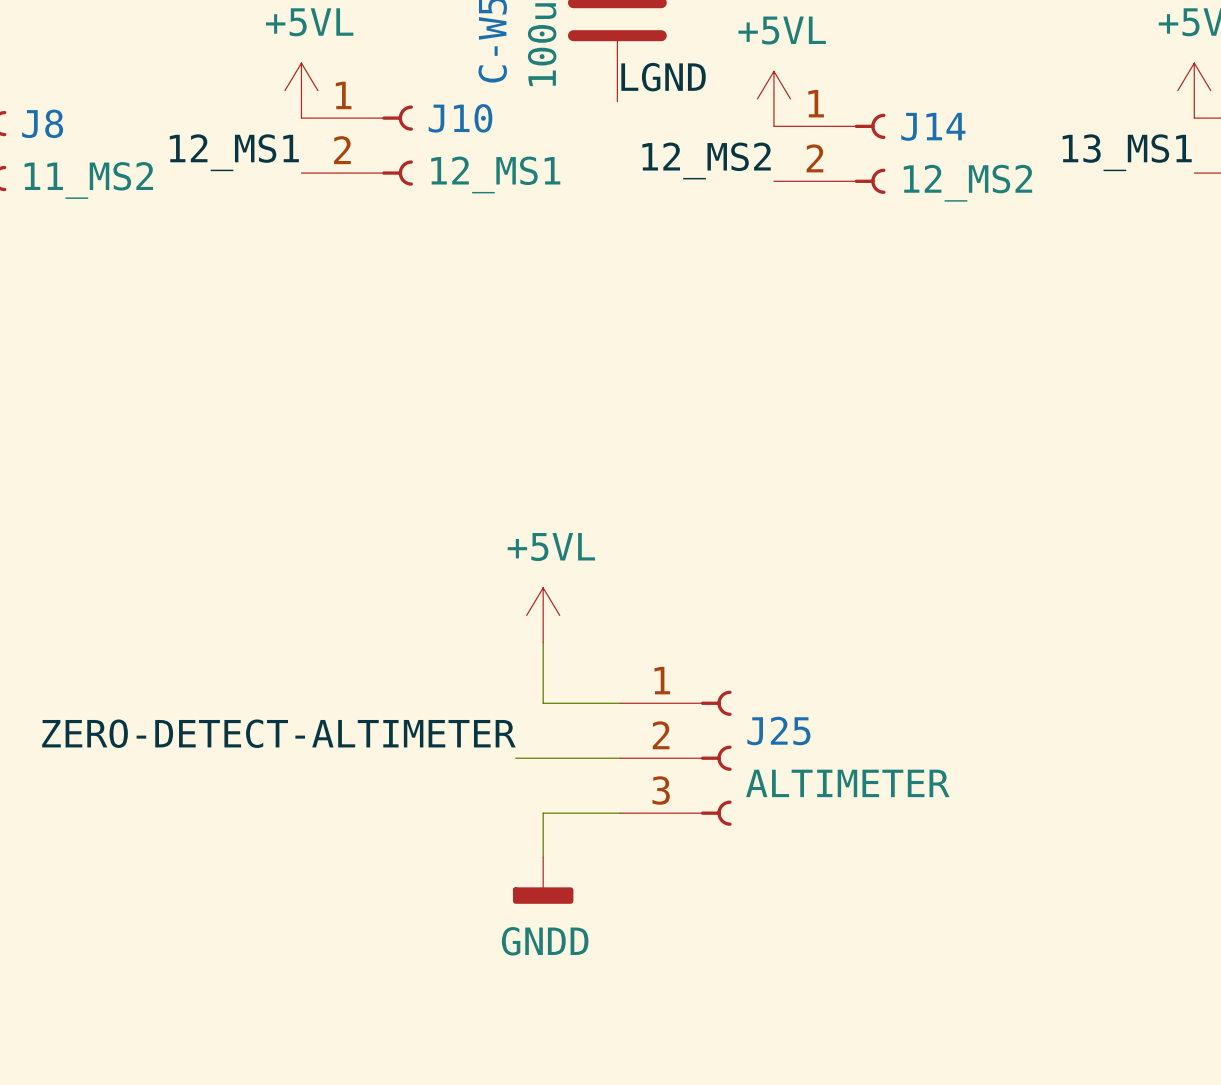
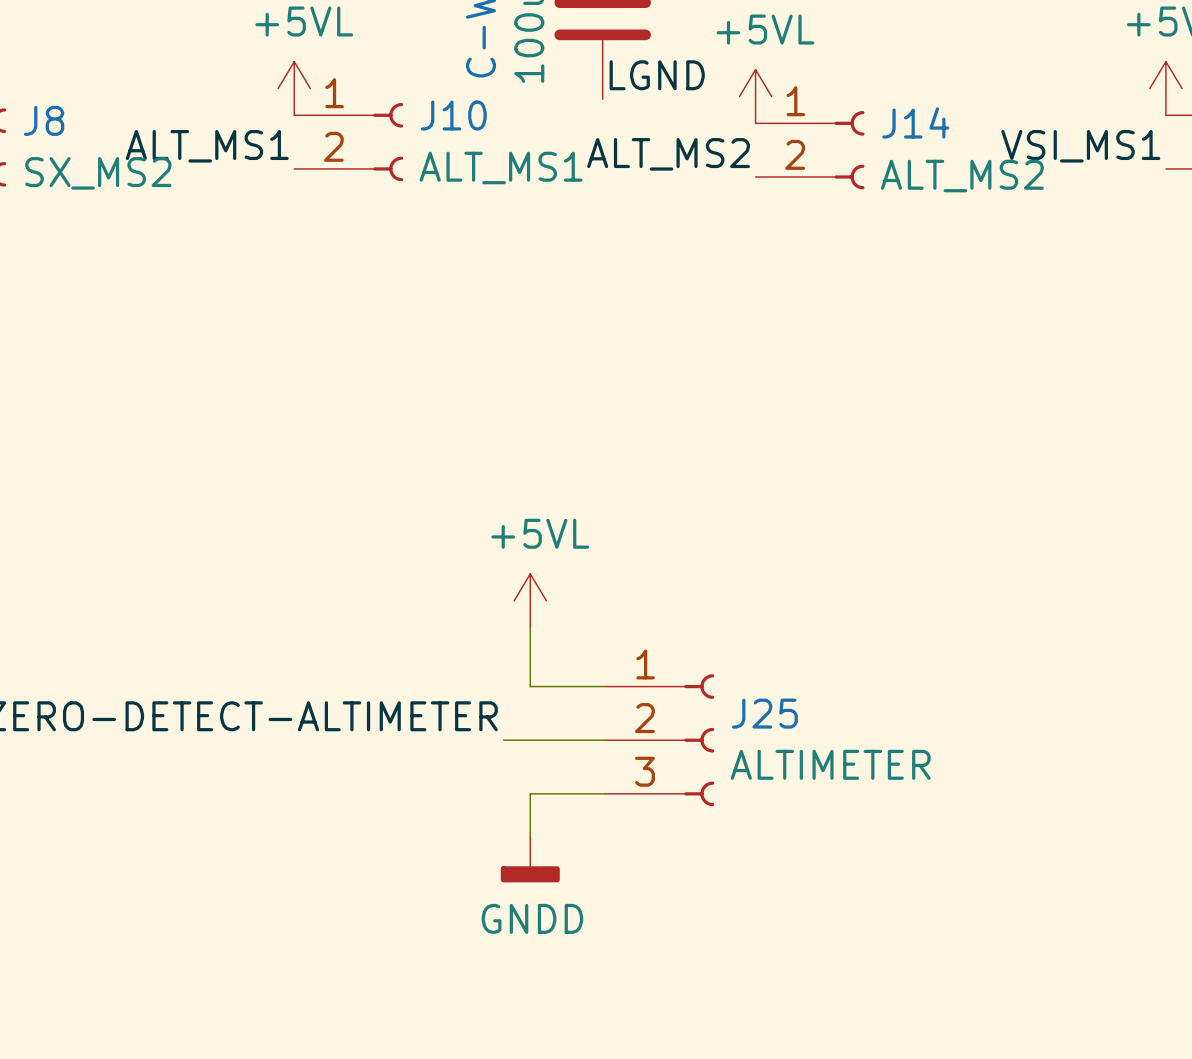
label: 12_MS1 (234, 152) -> ALT_MS1 (207, 146)
label: 13_MS1 (1127, 152) -> VSI_MS1 (1080, 146)
label: 12_MS2 (706, 160) -> ALT_MS2 (668, 154)
J10 value: 12_MS1 (495, 174) -> ALT_MS1 (501, 167)
J8 value: 11_MS2 (88, 180) -> SX_MS2 (98, 173)
J14 value: 12_MS2 (967, 183) -> ALT_MS2 (962, 176)

